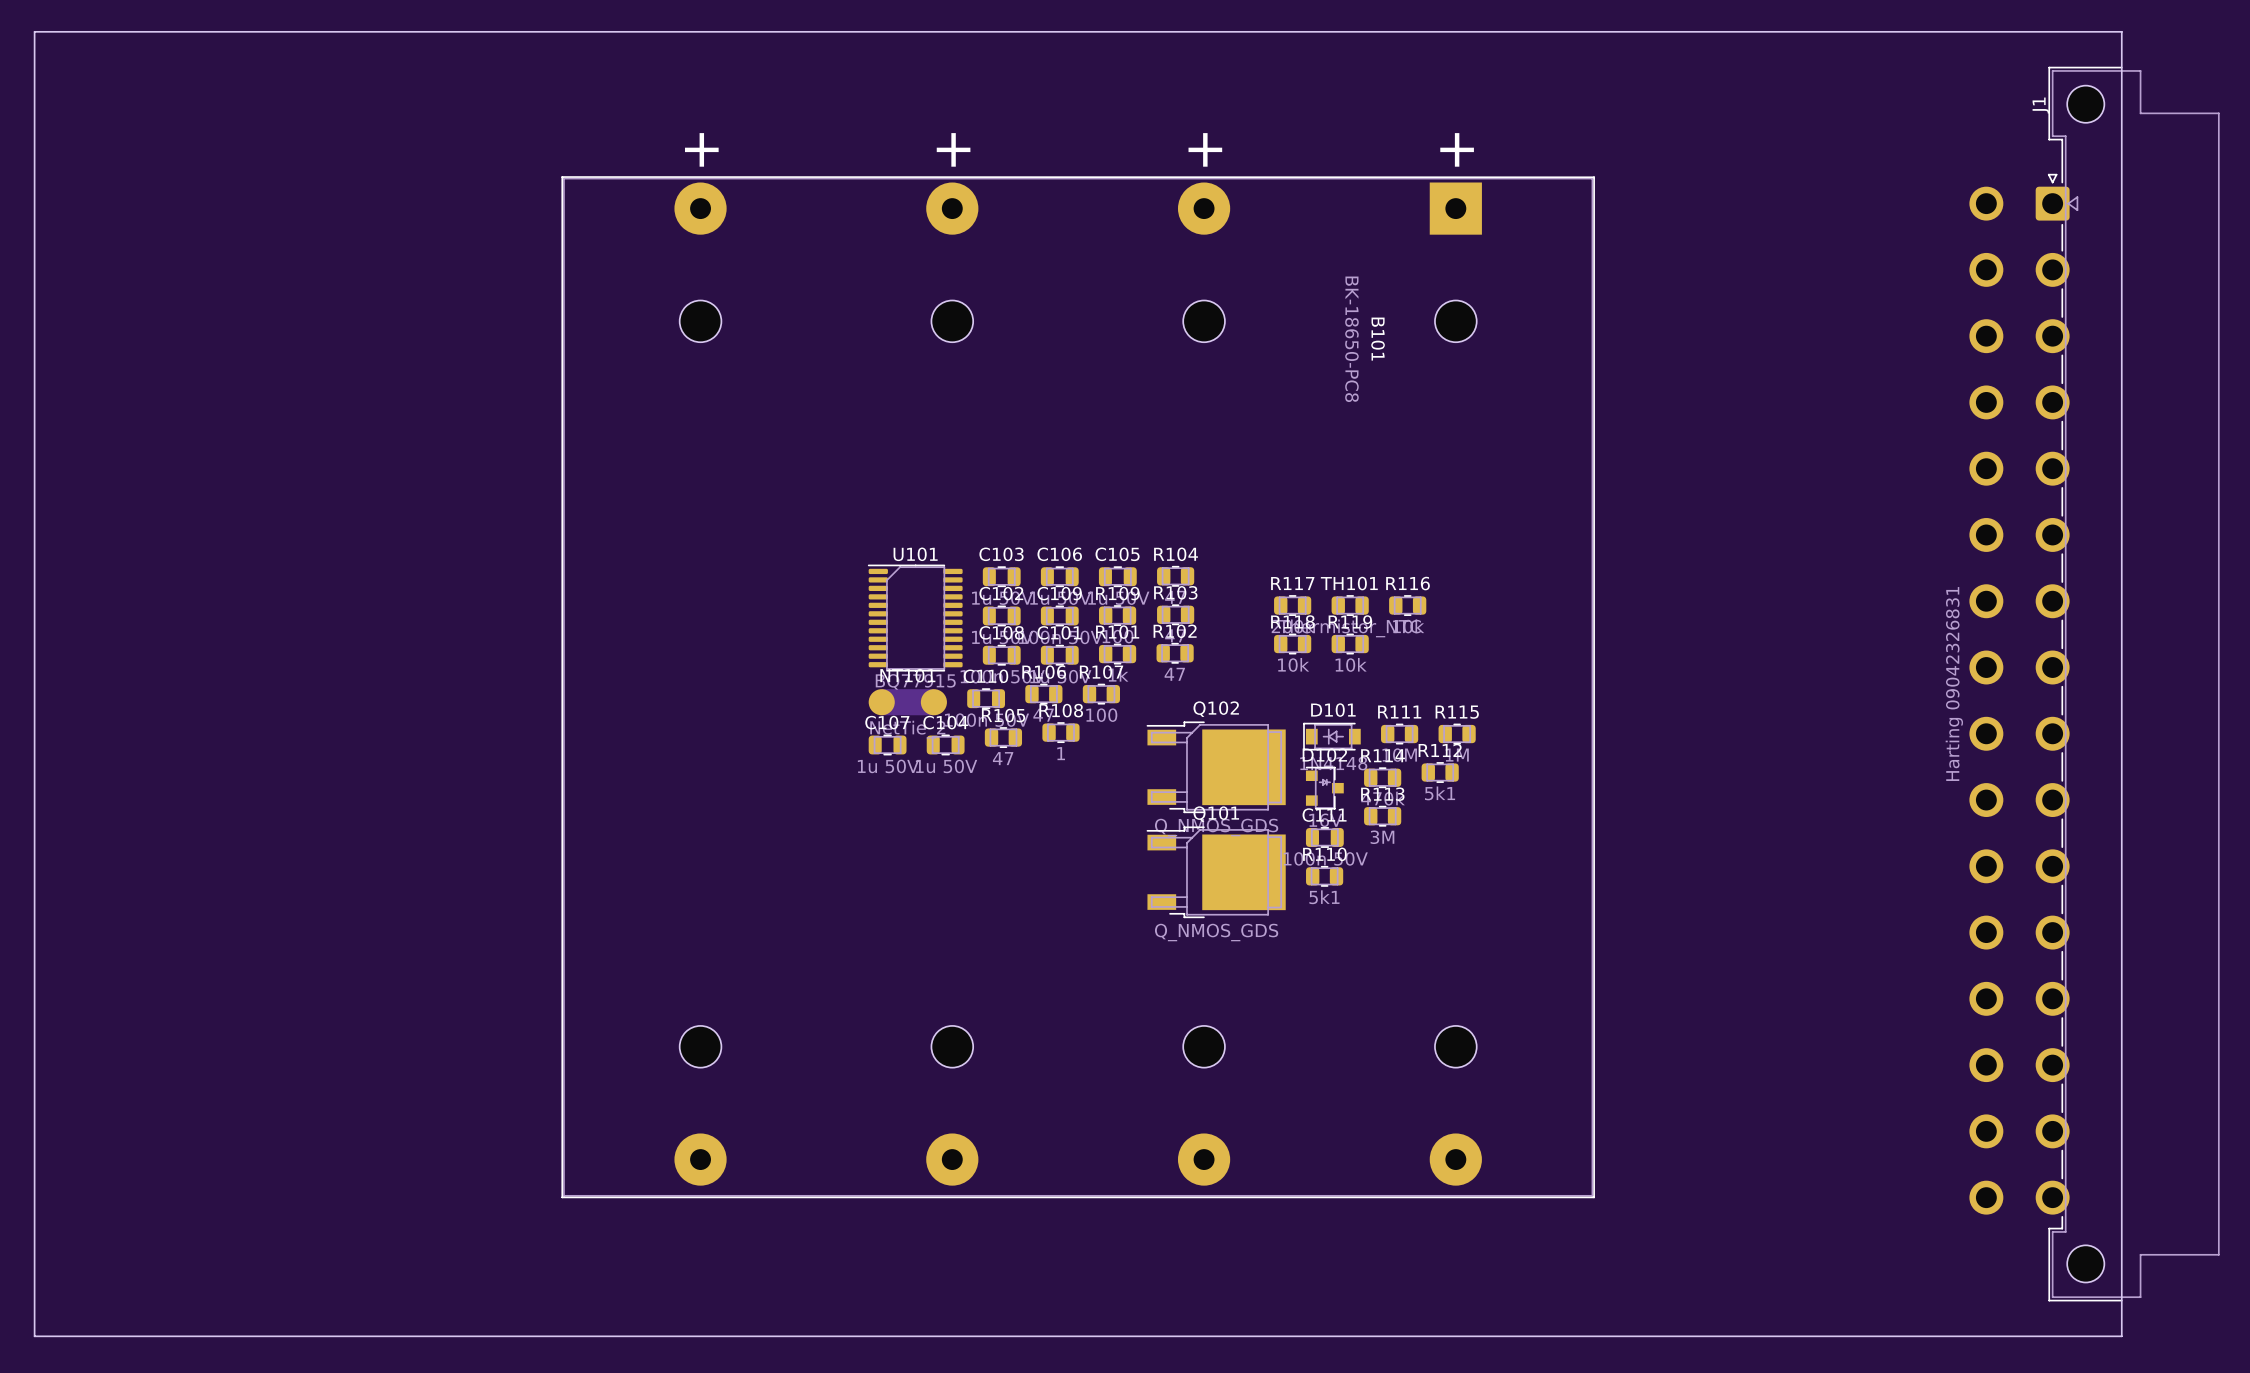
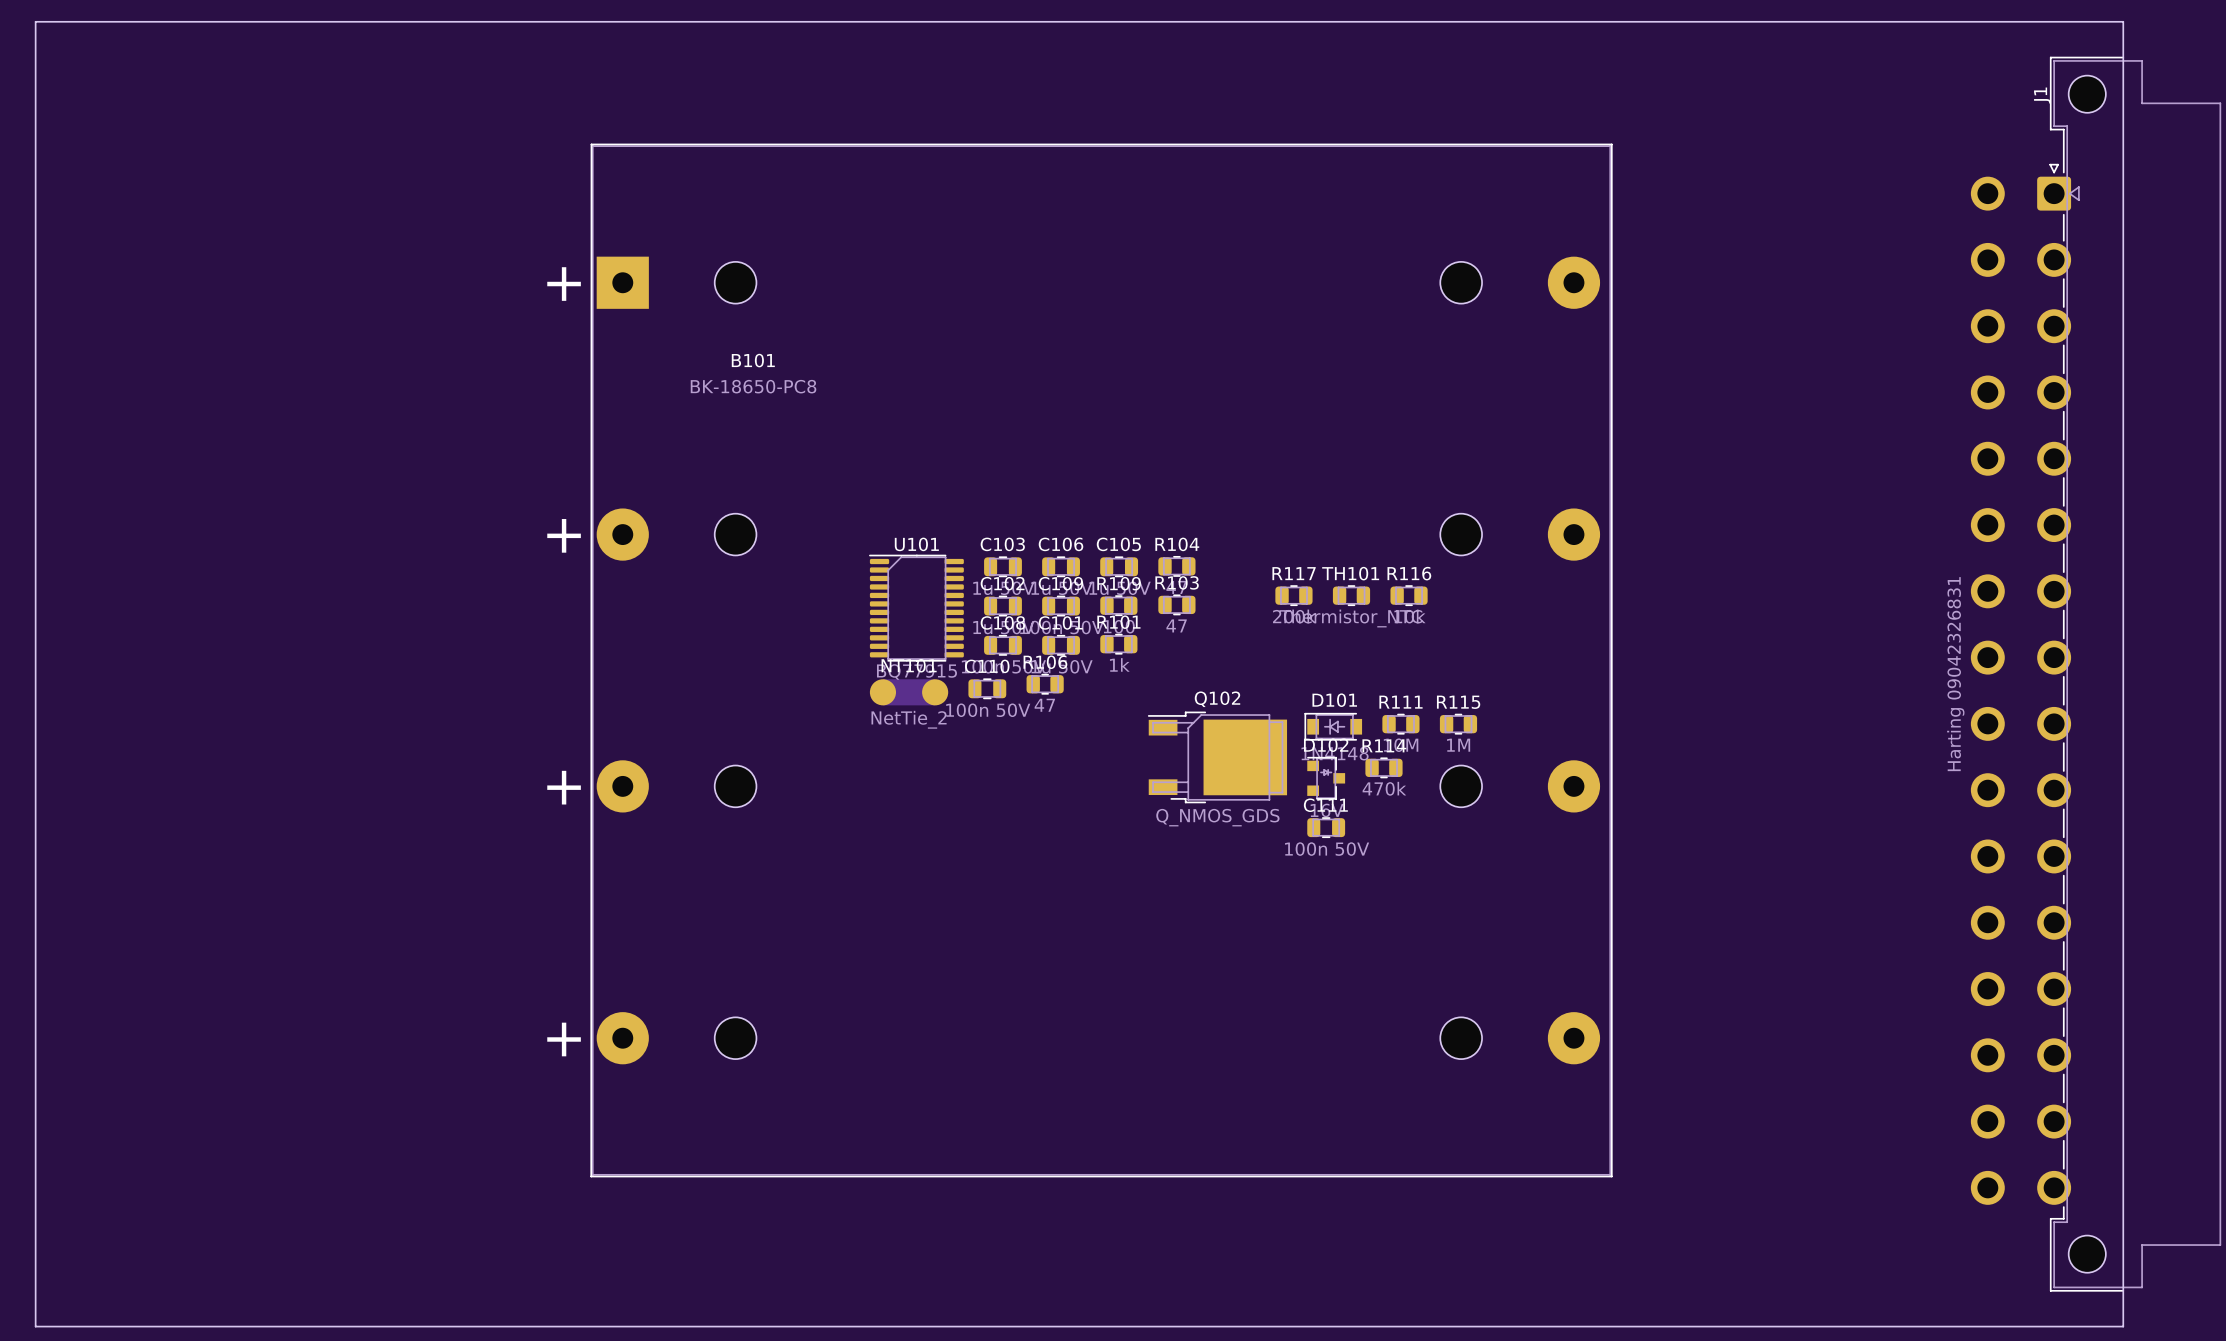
R118: 10k (1292, 644) -> none
R119: 10k (1350, 644) -> none
R102: 47 (1175, 653) -> none
B101 rotation: 0° (1078, 687) -> 90° counterclockwise (1101, 660)
R107: 100 (1101, 694) -> none
R108: 1 (1060, 732) -> none
R105: 47 (1003, 737) -> none
C107: 1u 50V (887, 744) -> none
C104: 1u 50V (945, 744) -> none
R112: 5k1 (1440, 772) -> none
R113: 3M (1382, 816) -> none
Q101: Q_NMOS_GDS (1216, 872) -> none
R110: 5k1 (1324, 876) -> none

